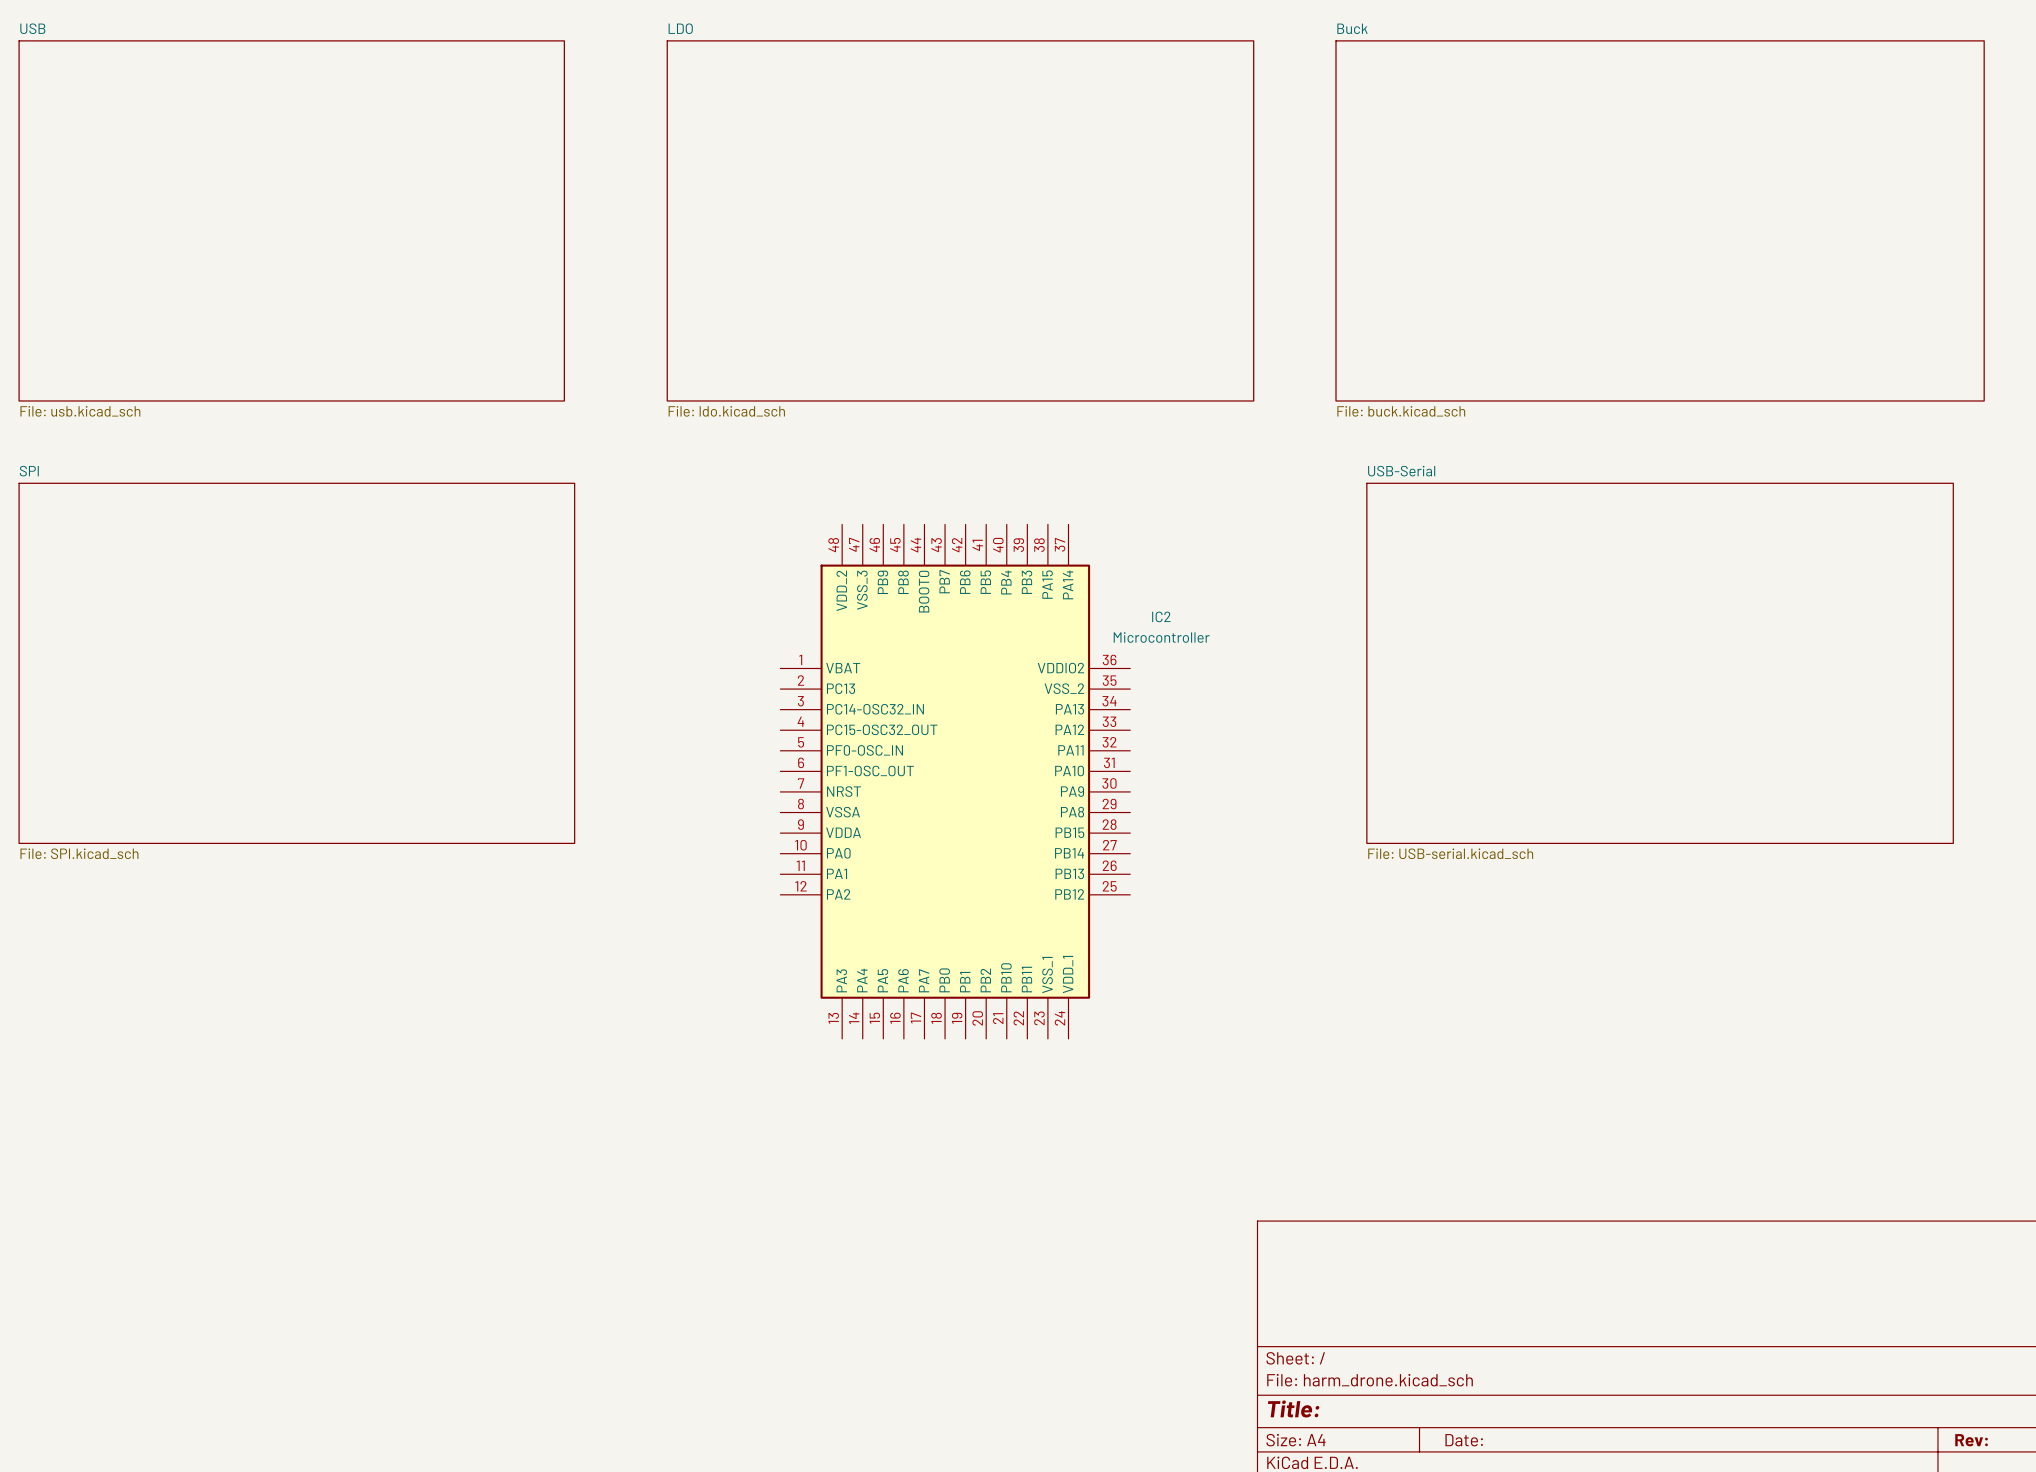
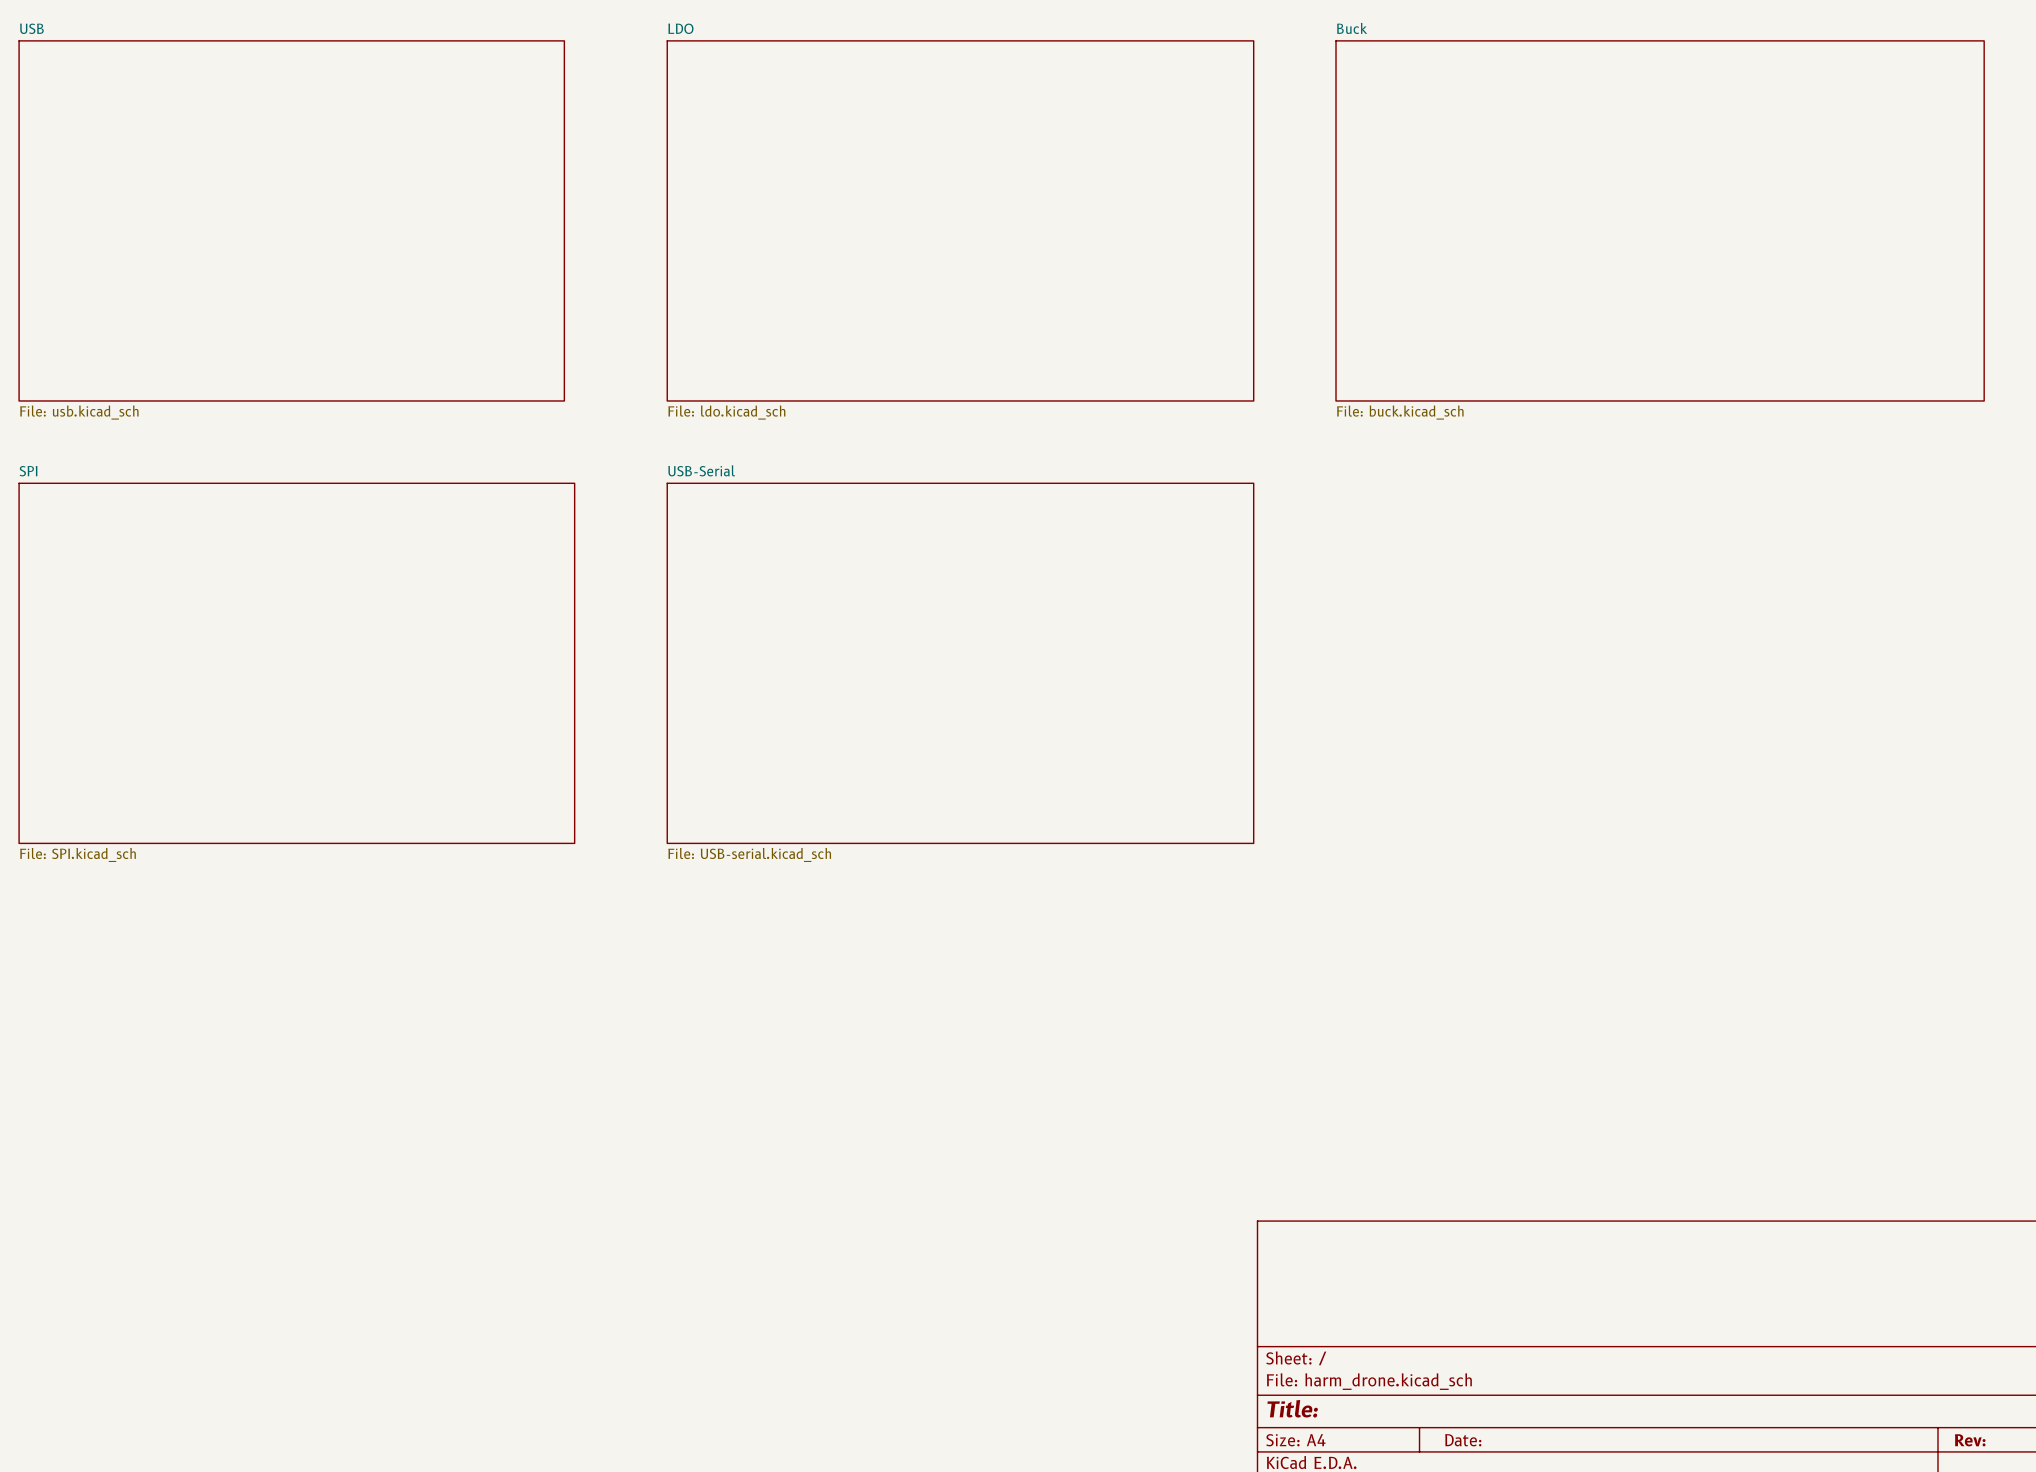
sheet USB-Serial: none -> File: USB-serial.kicad_sch (960, 663)
sheet USB-Serial: File: USB-serial.kicad_sch (1660, 663) -> none
IC2: Microcontroller (955, 781) -> none

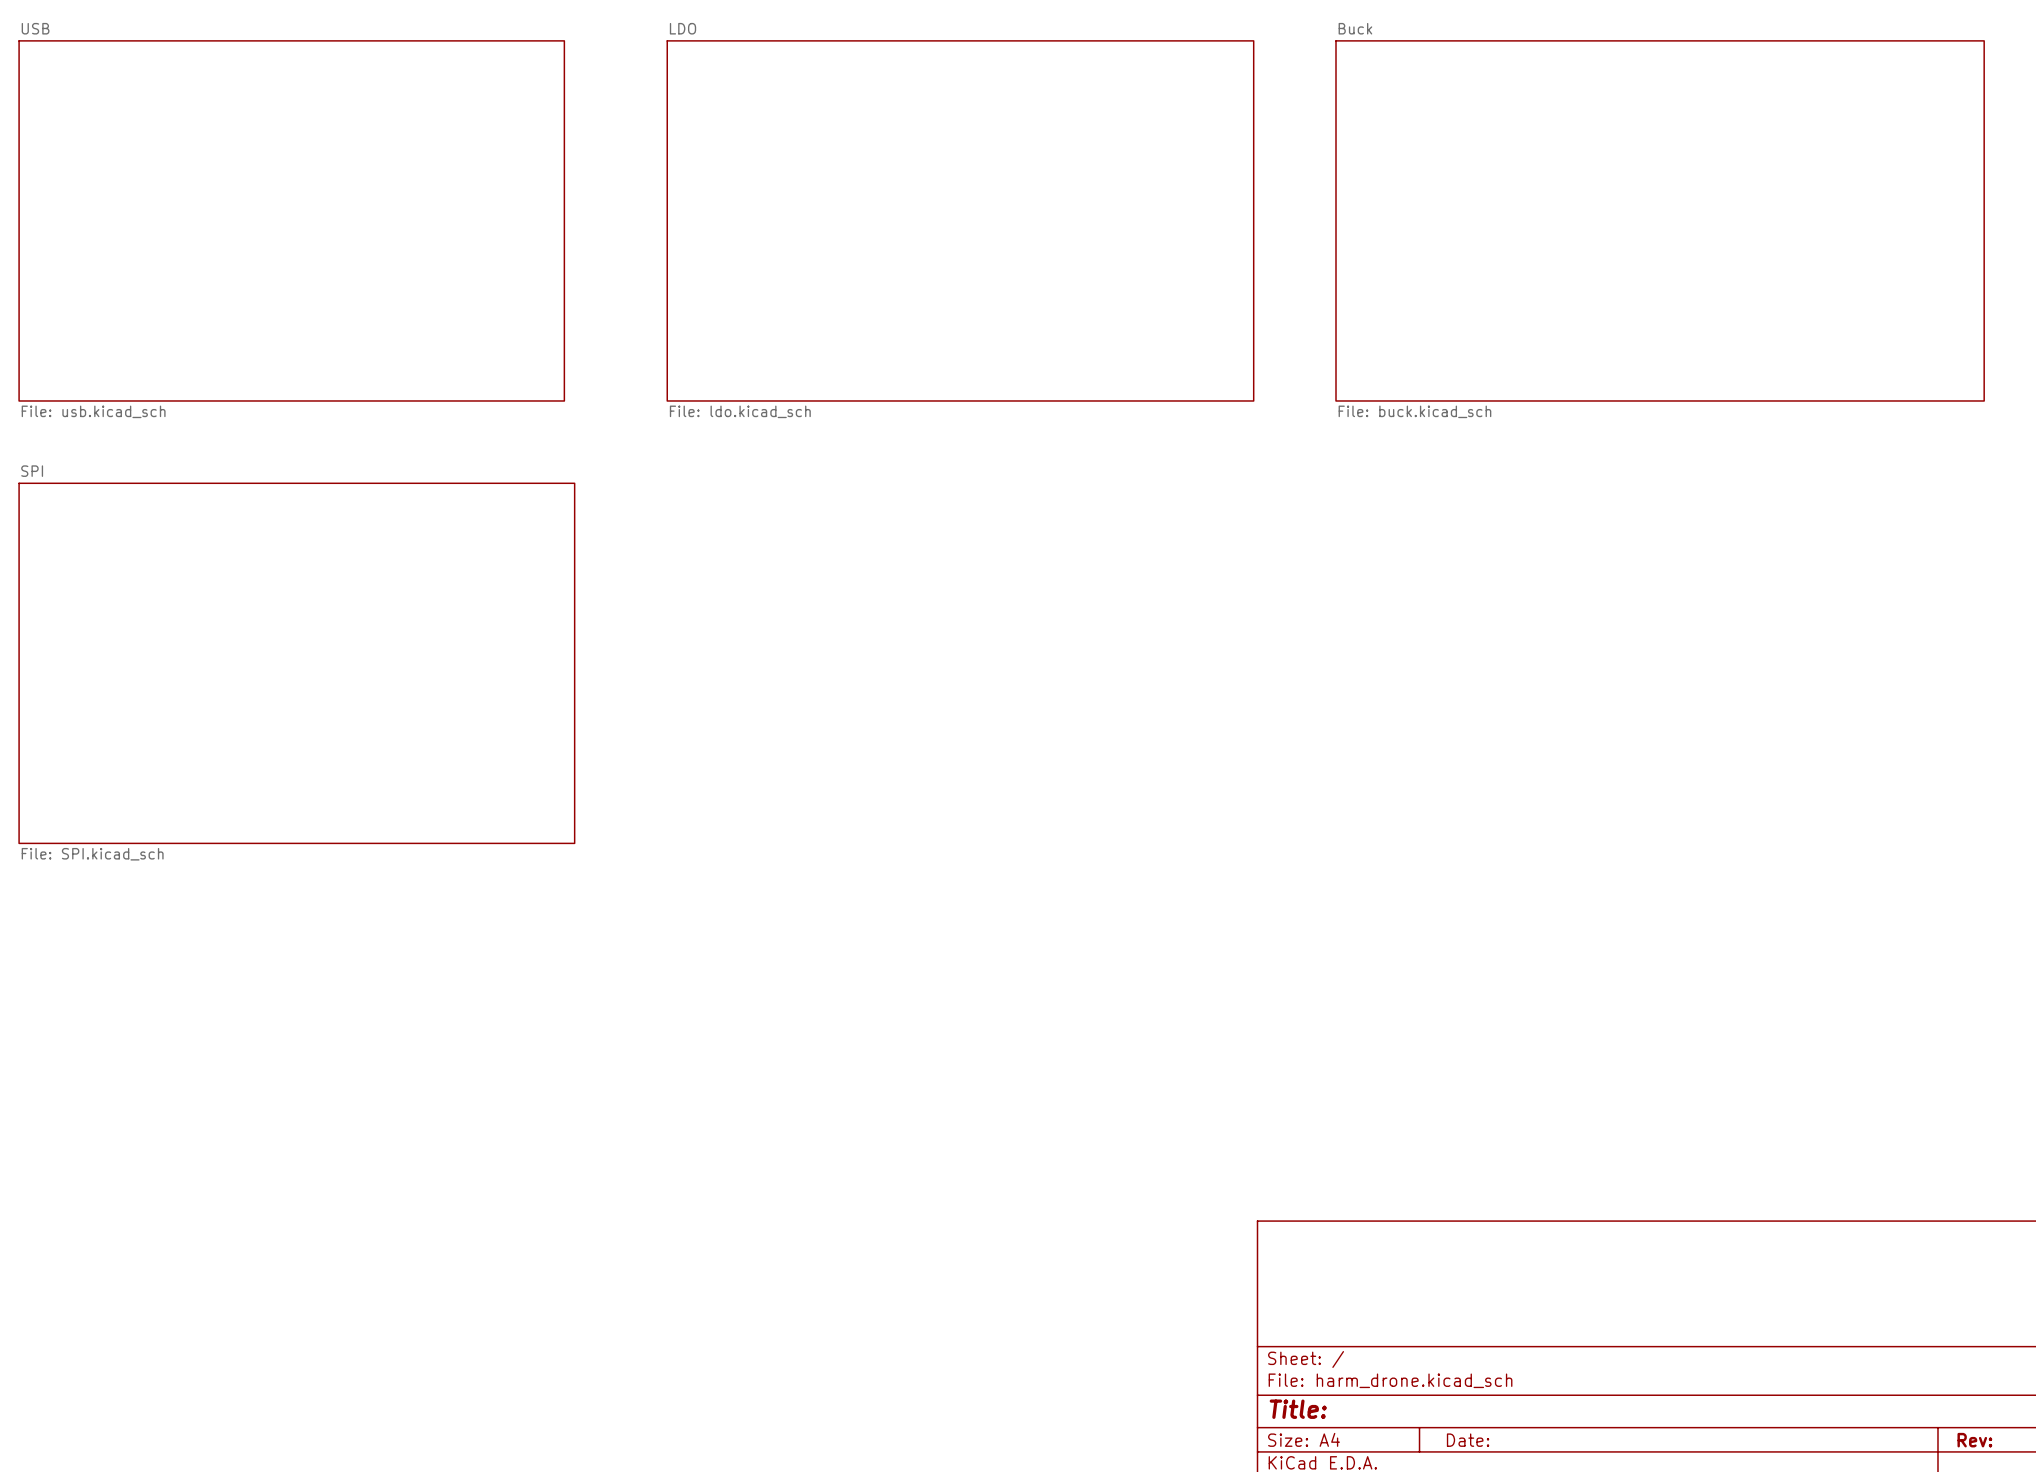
sheet USB-Serial: File: USB-serial.kicad_sch (960, 663) -> none

